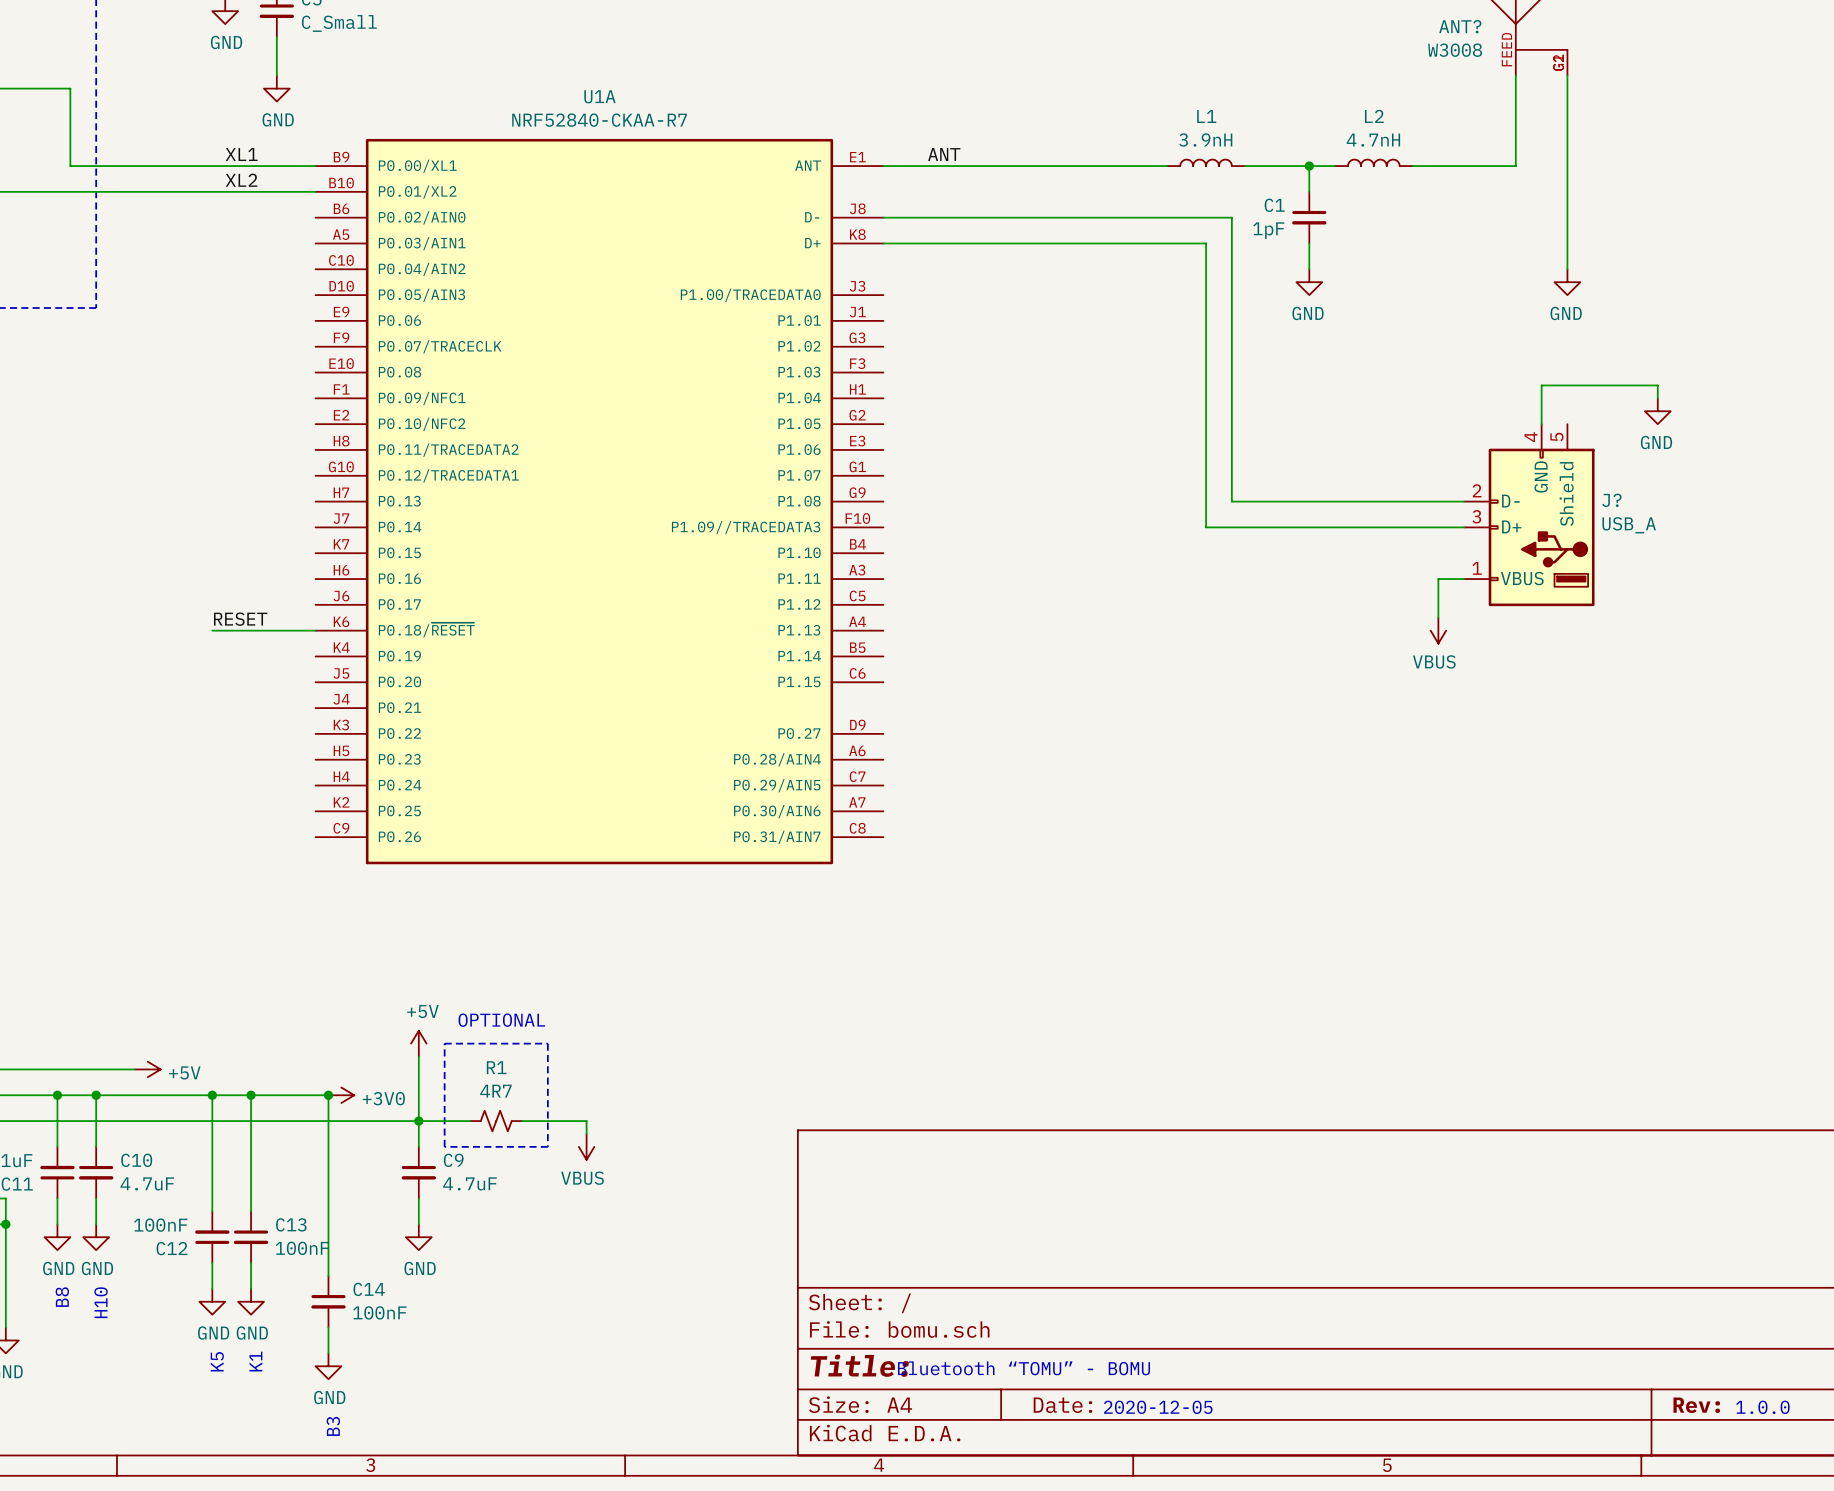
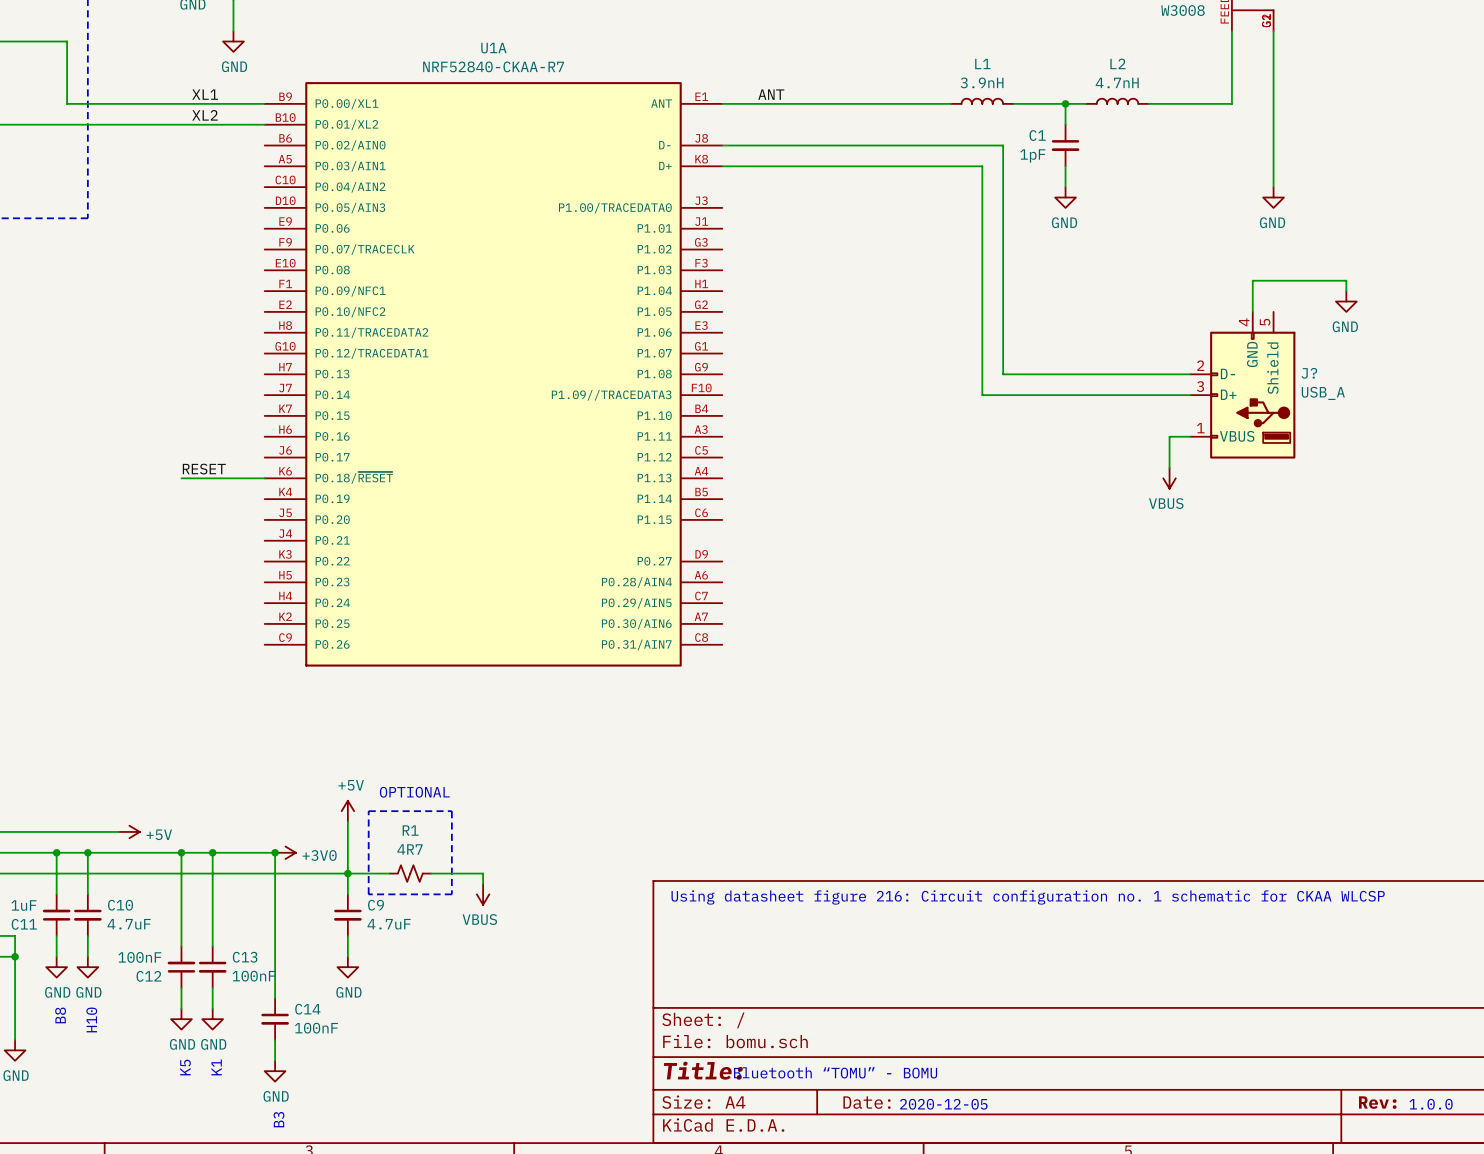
text: none -> Using datasheet figure 216: Circuit configuration no. 1 schematic for CKAA WLCSP (1028, 897)

